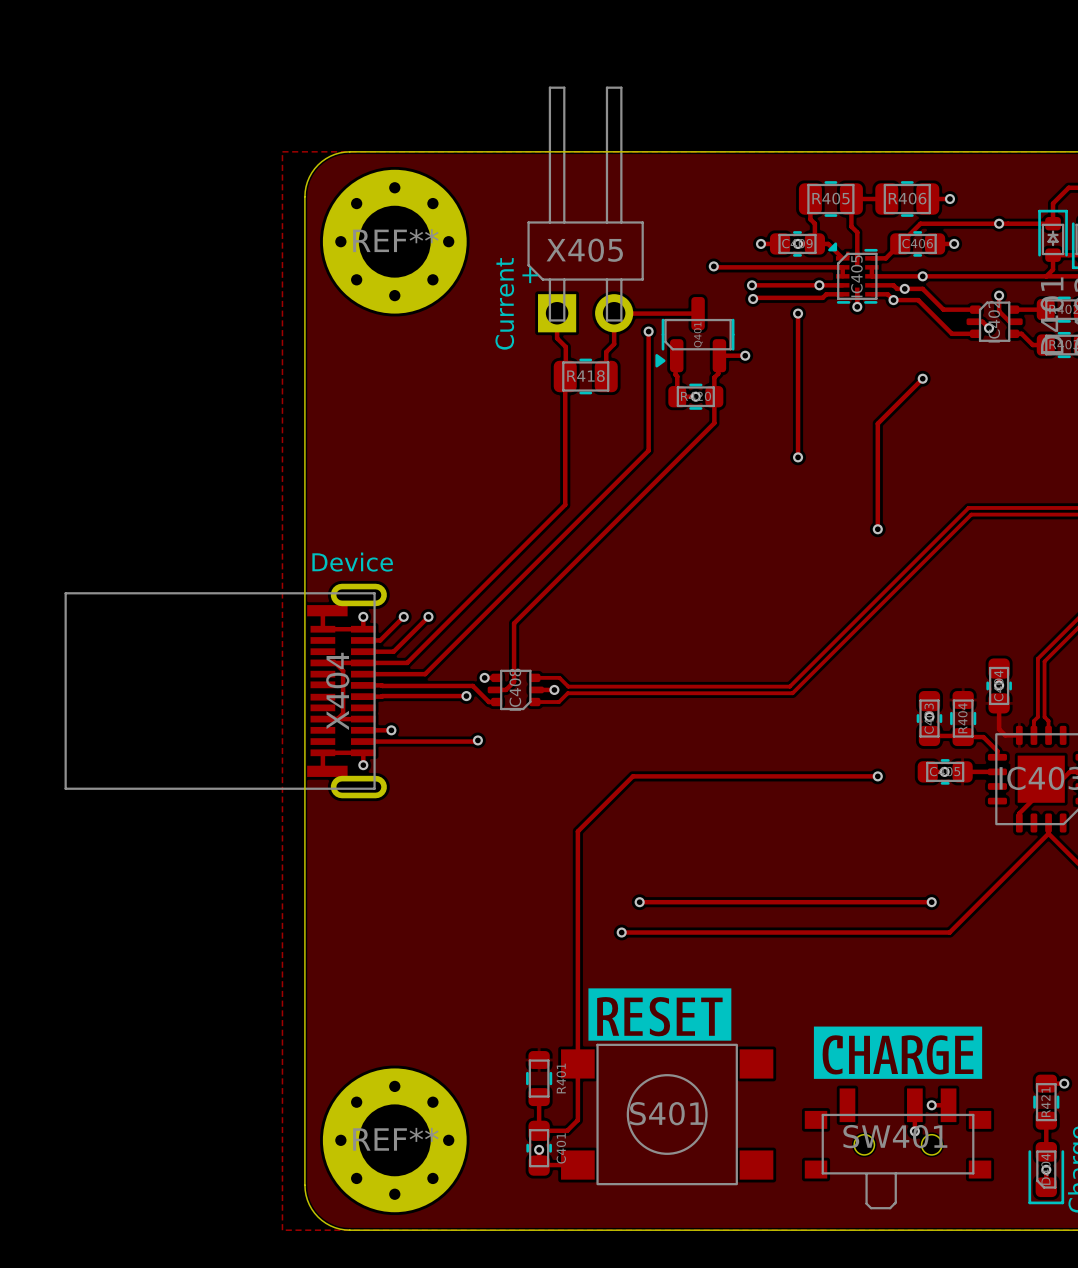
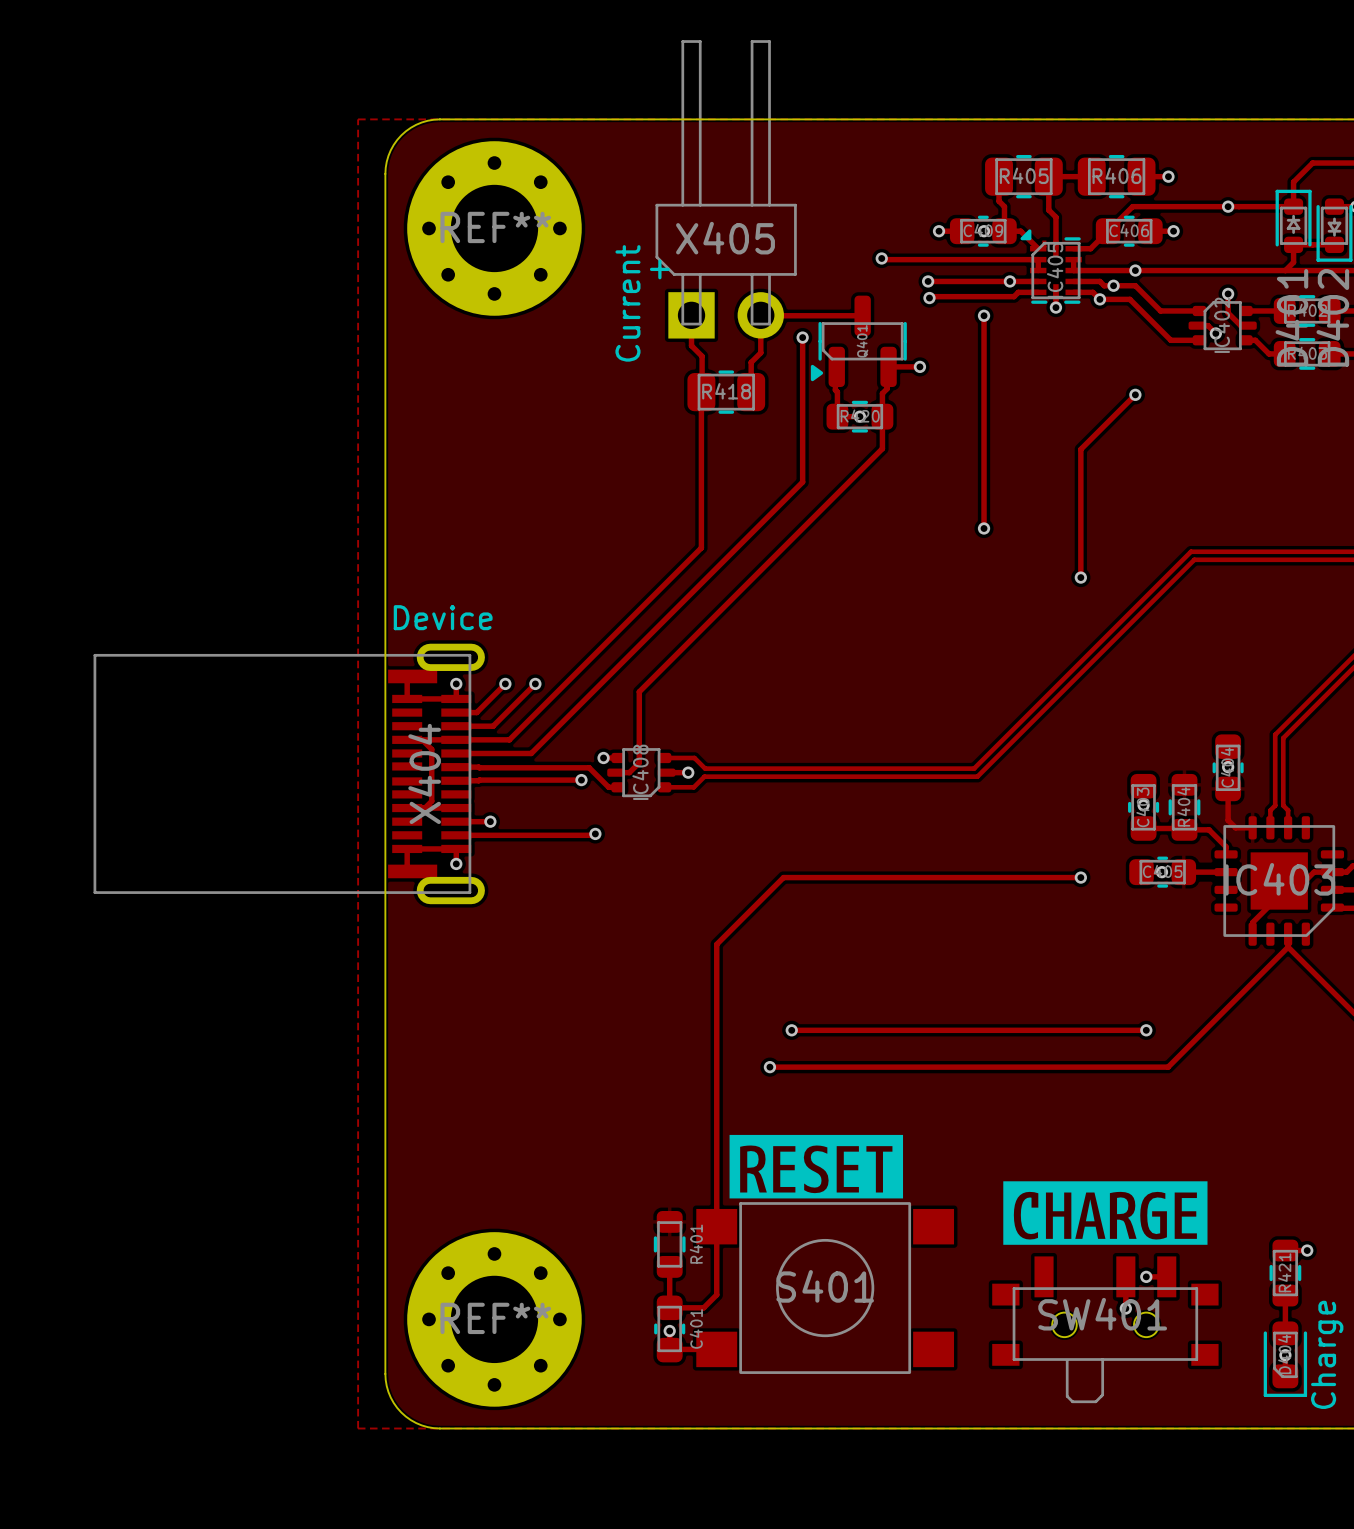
track: none -> (984, 490) (984, 528)
via position: (798, 457) -> (984, 528)

